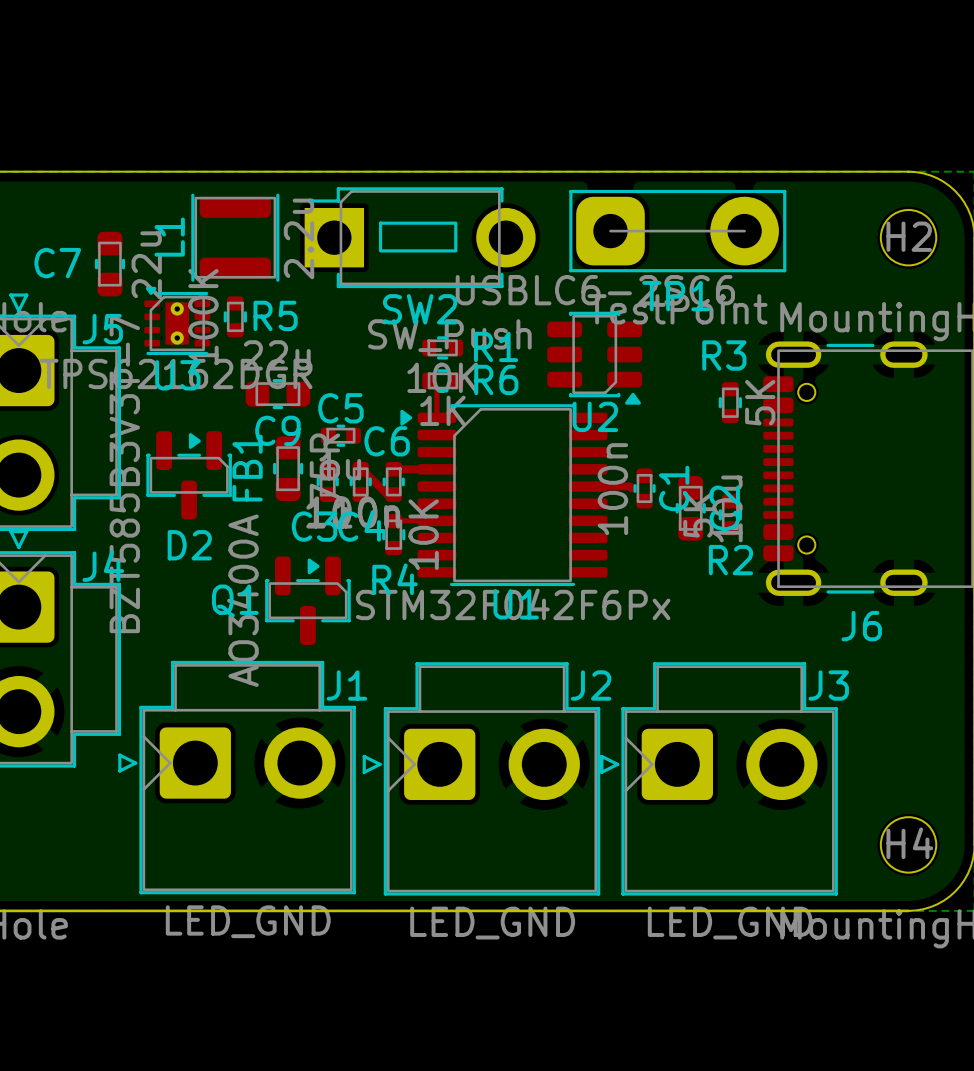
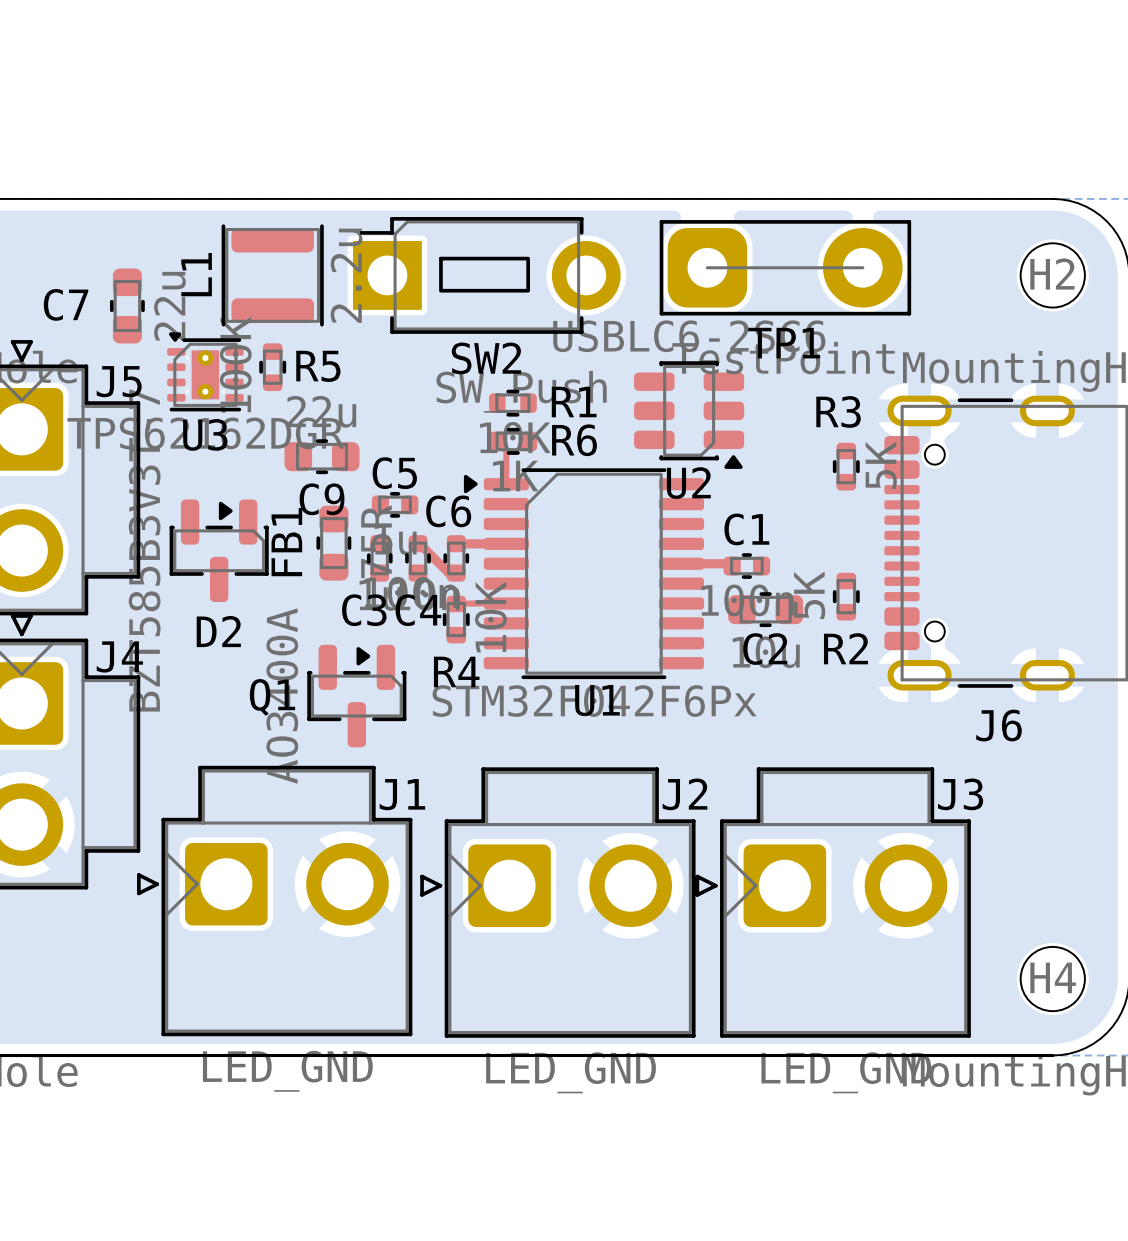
C1 rotation: 0° (644, 488) -> 90° clockwise (746, 566)
C2 rotation: 0° (690, 508) -> 90° clockwise (765, 609)

